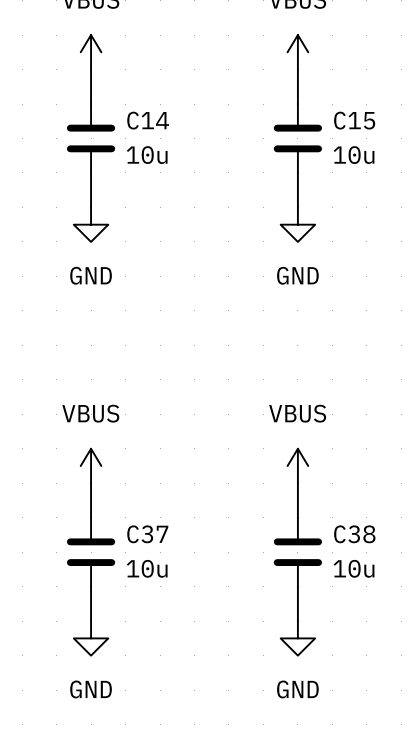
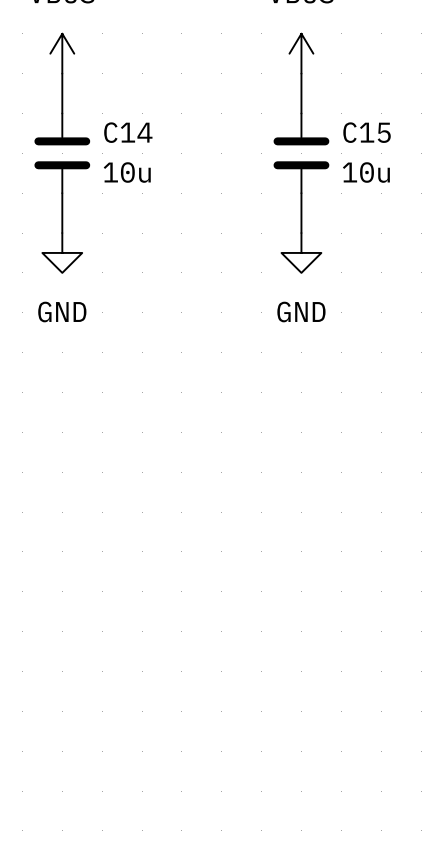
power symbol: VBUS (91, 466) -> none
power symbol: VBUS (297, 466) -> none
wire: (91, 483) (91, 517) -> none
wire: (297, 483) (297, 517) -> none
C37: 10u (91, 552) -> none
C38: 10u (297, 552) -> none
wire: (91, 586) (91, 621) -> none
wire: (297, 586) (297, 621) -> none
power symbol: GND (91, 638) -> none
power symbol: GND (297, 638) -> none

